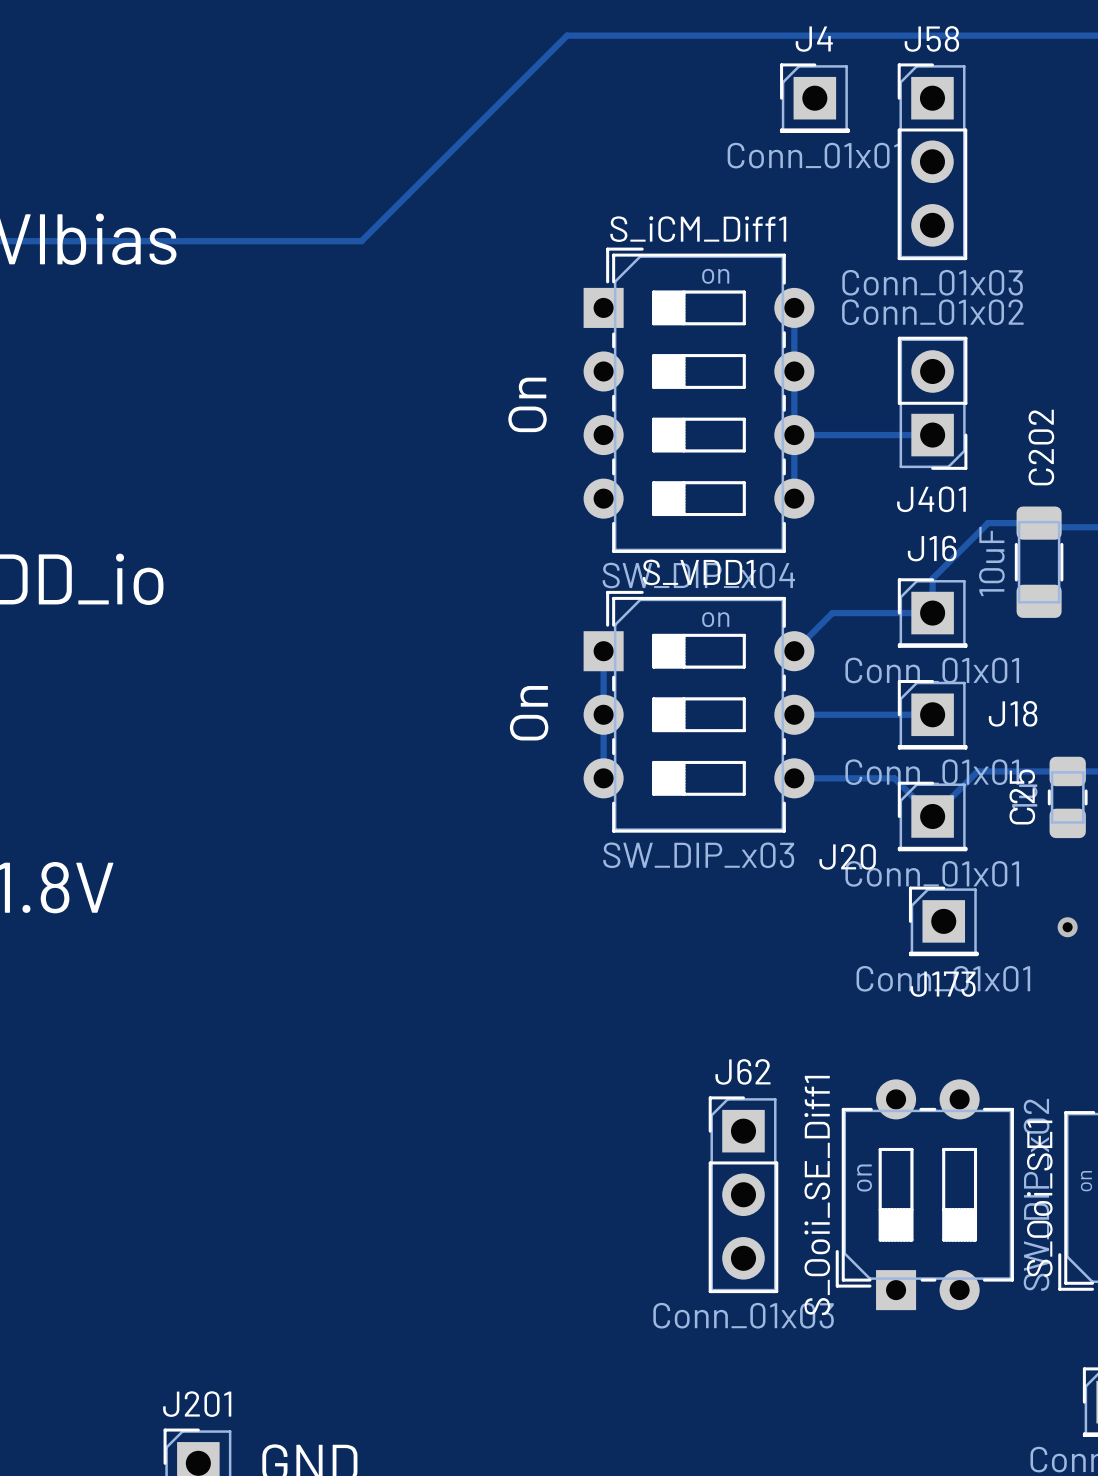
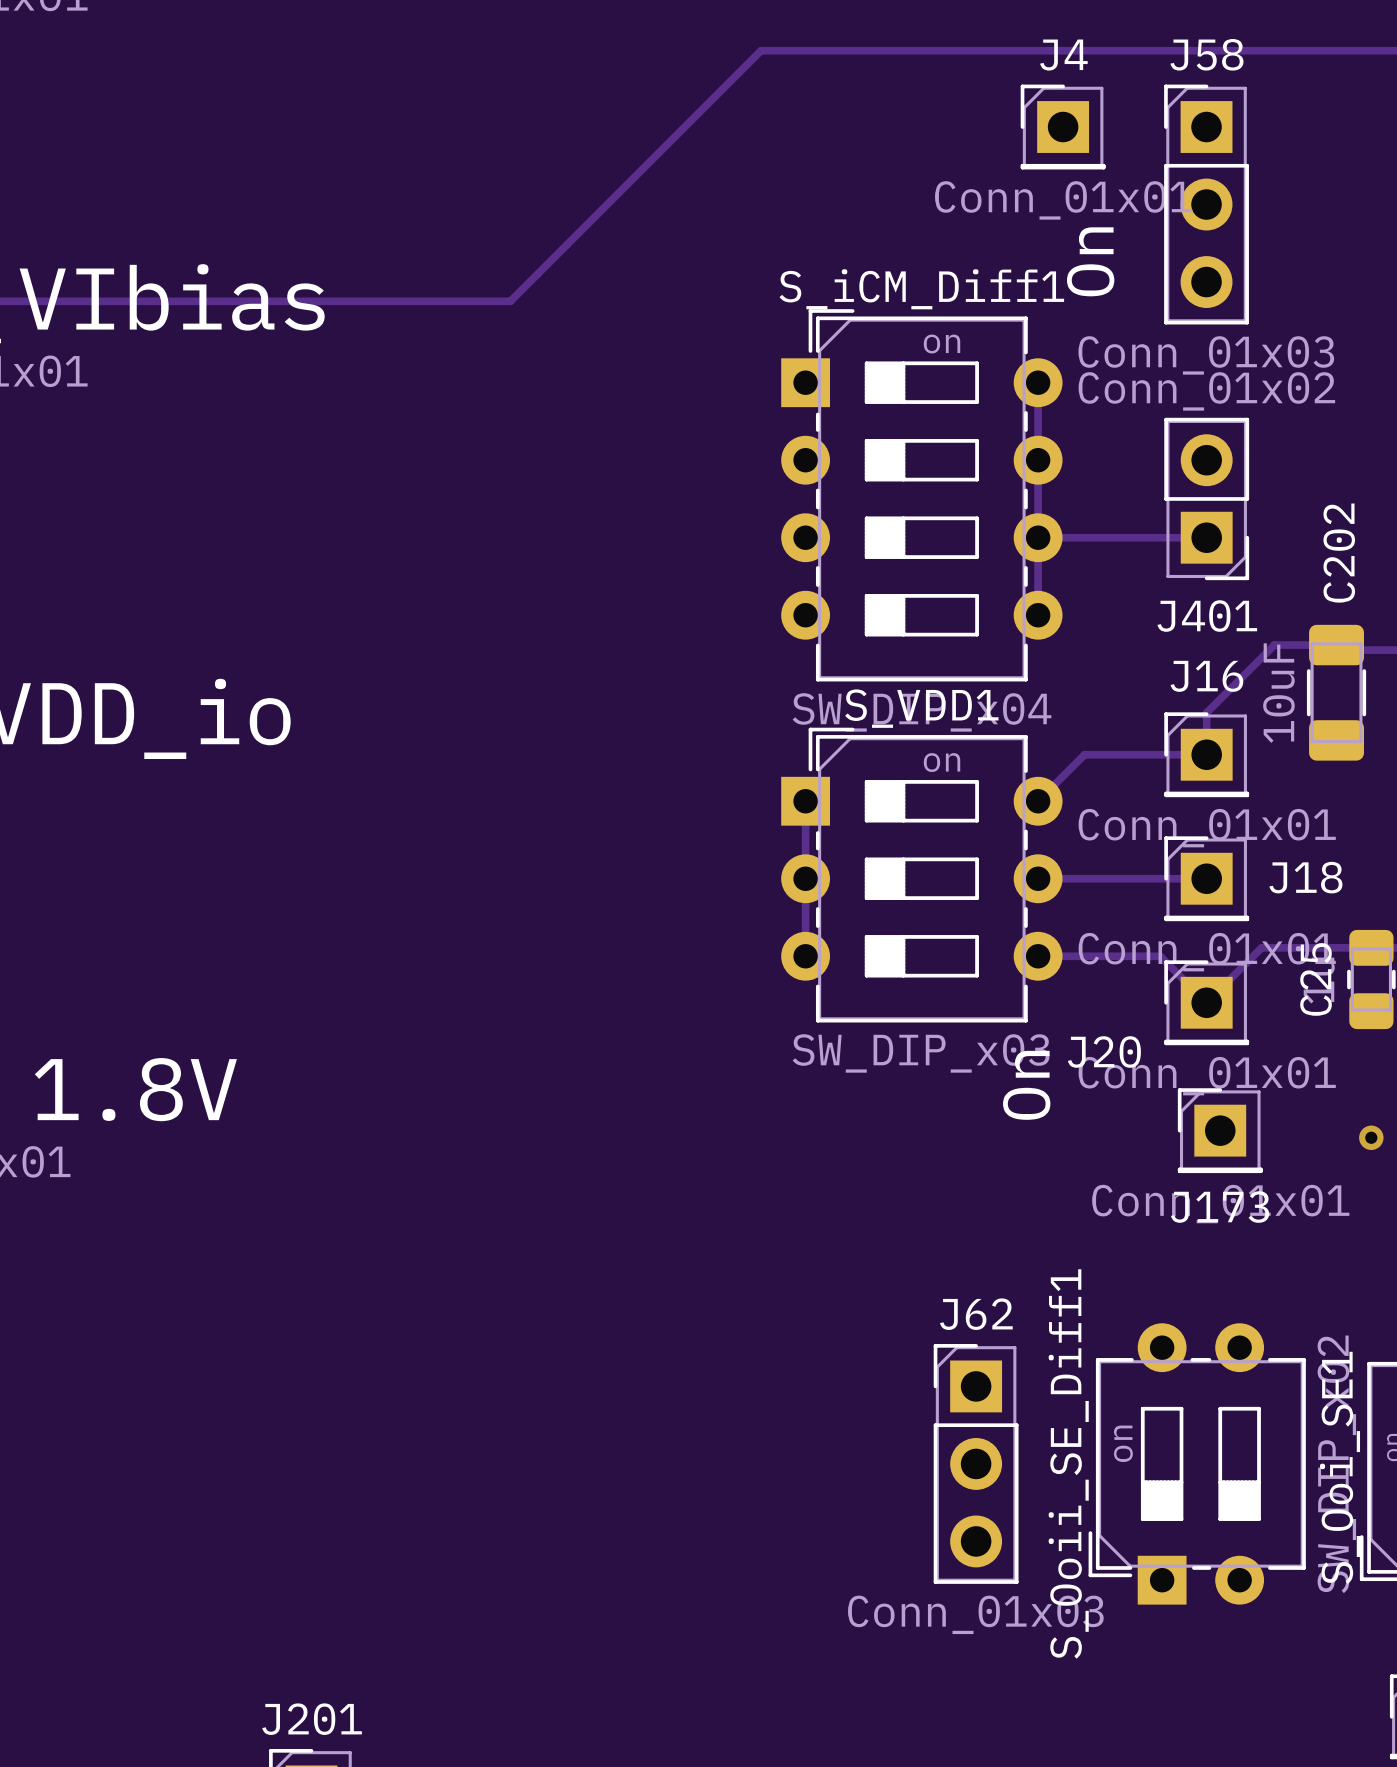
text: none -> On (1090, 261)
text: On (527, 404) -> none
text: On (529, 713) -> none
text: none -> On (1026, 1085)

